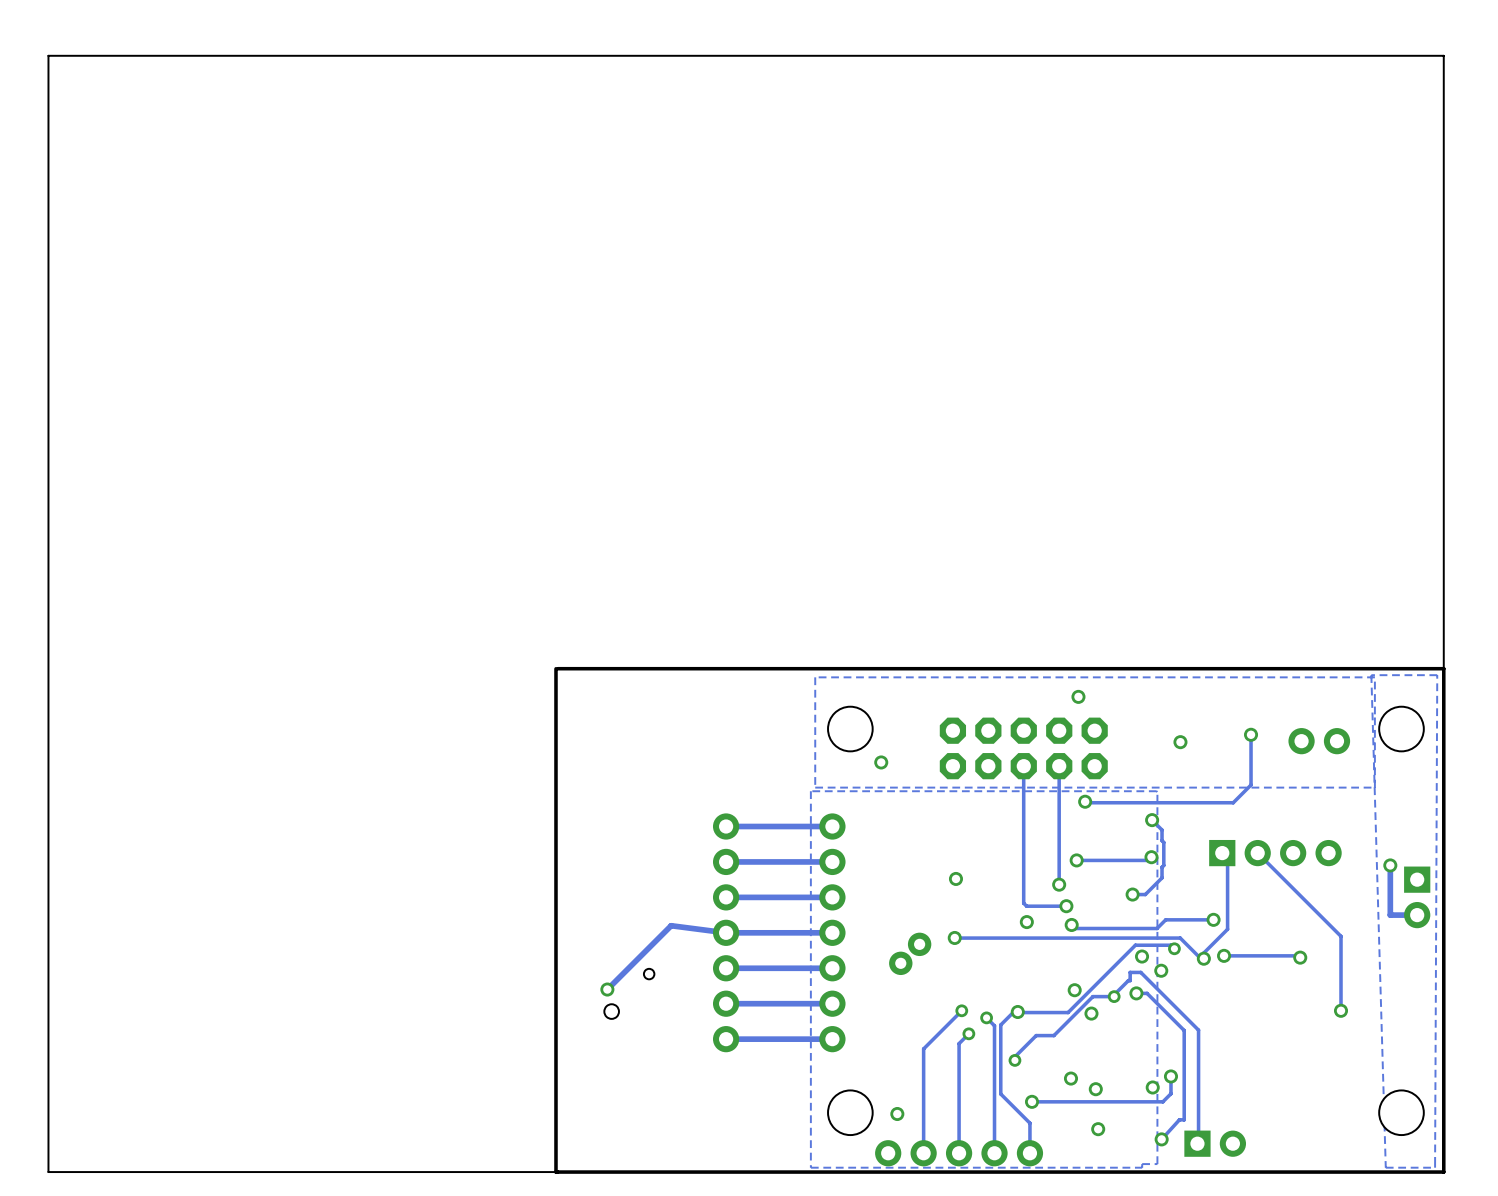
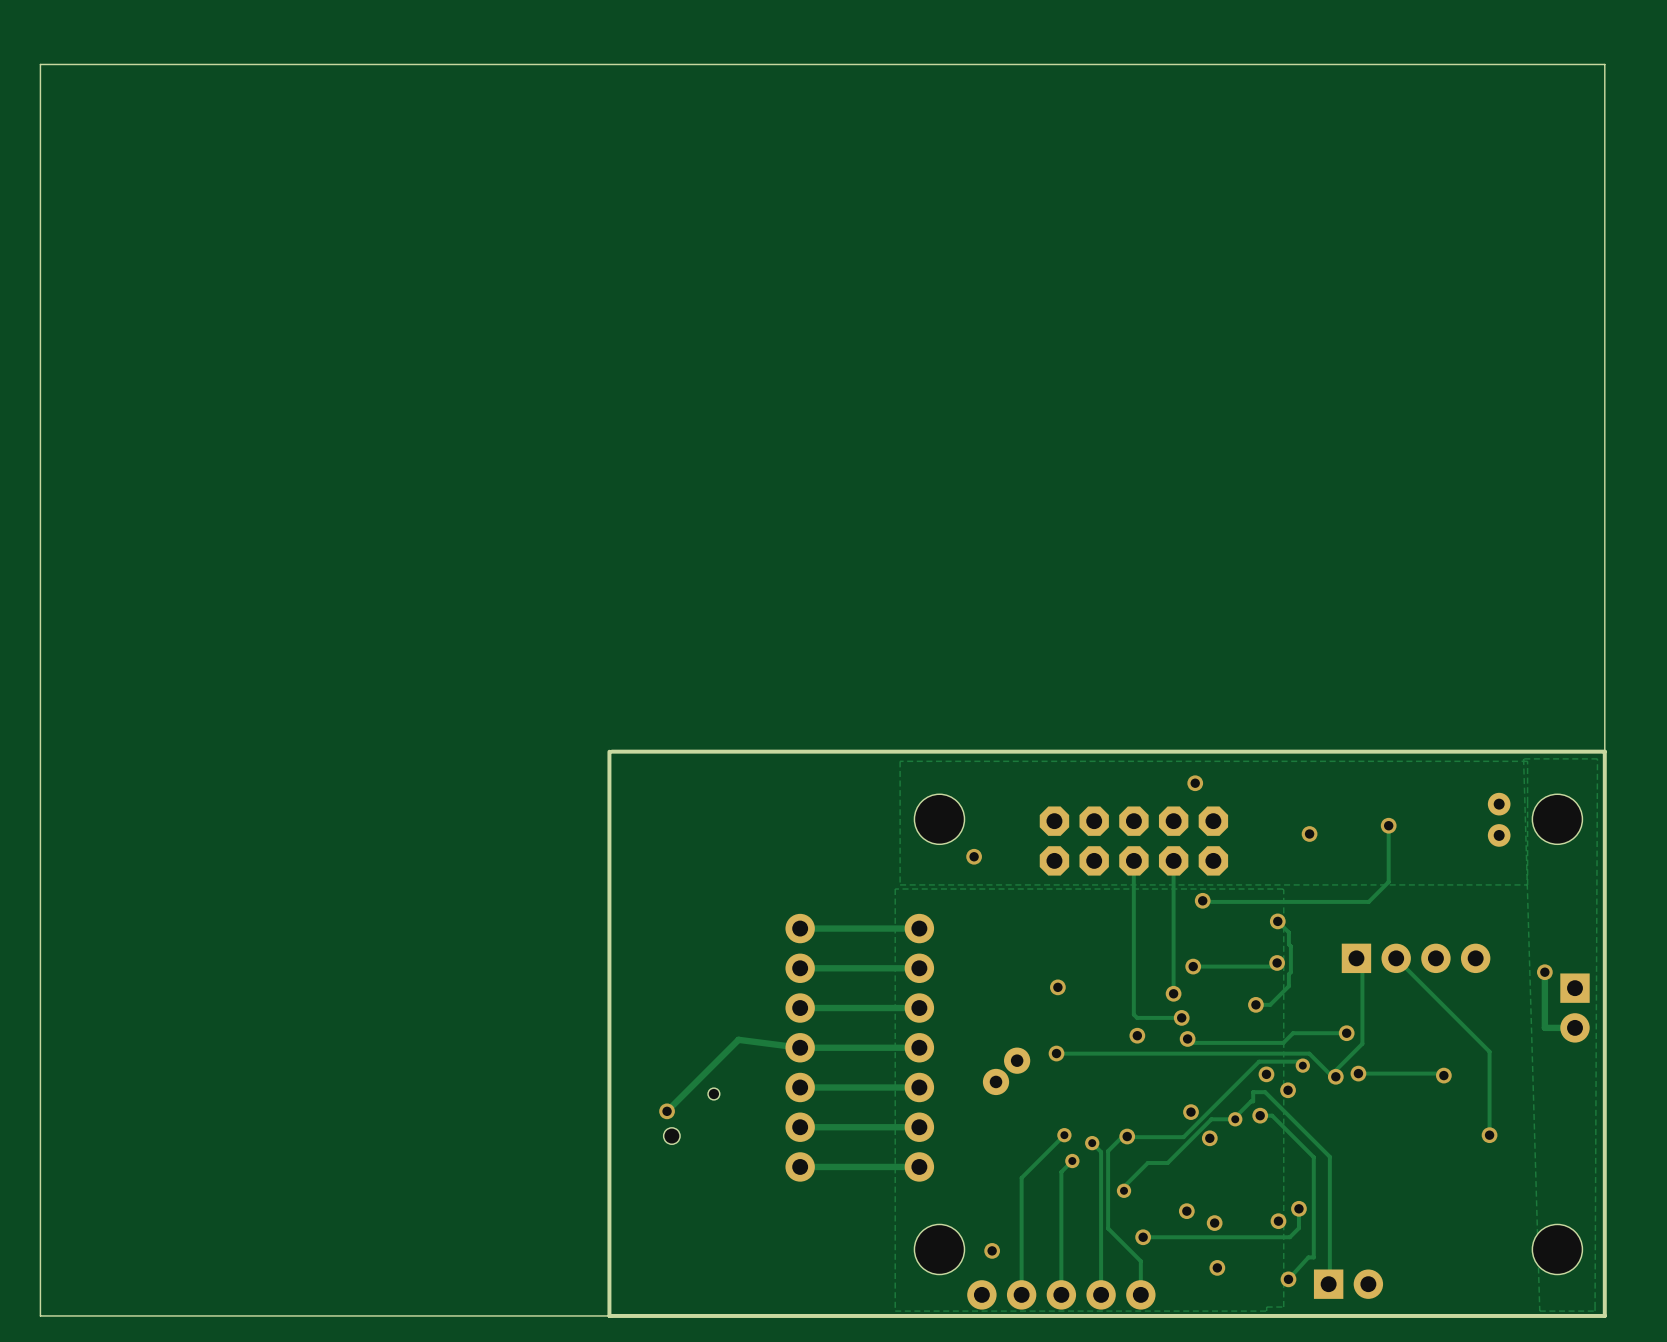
part: none -> (1499, 819)
part: (1319, 741) -> none

